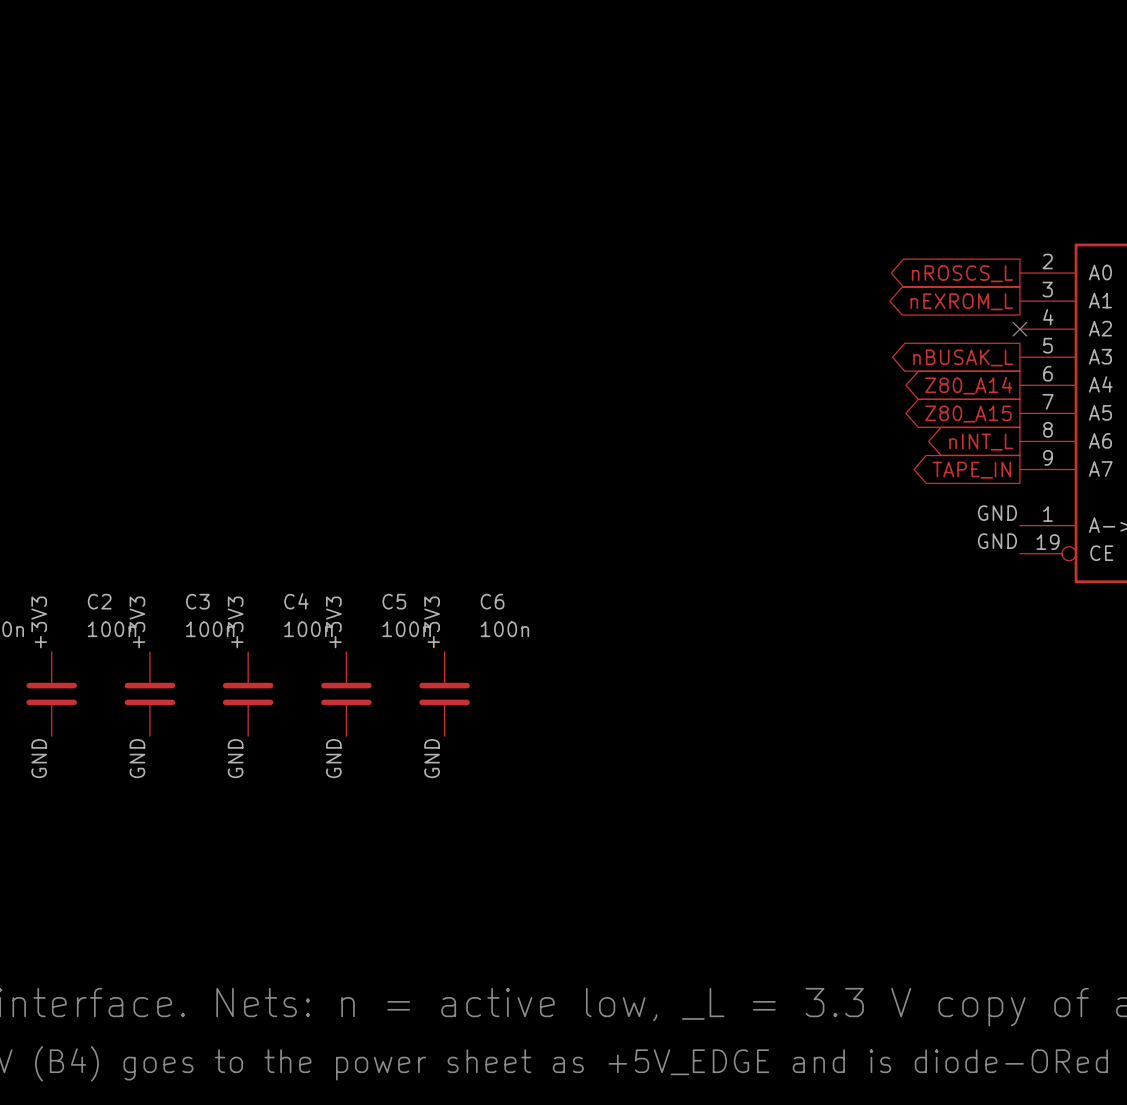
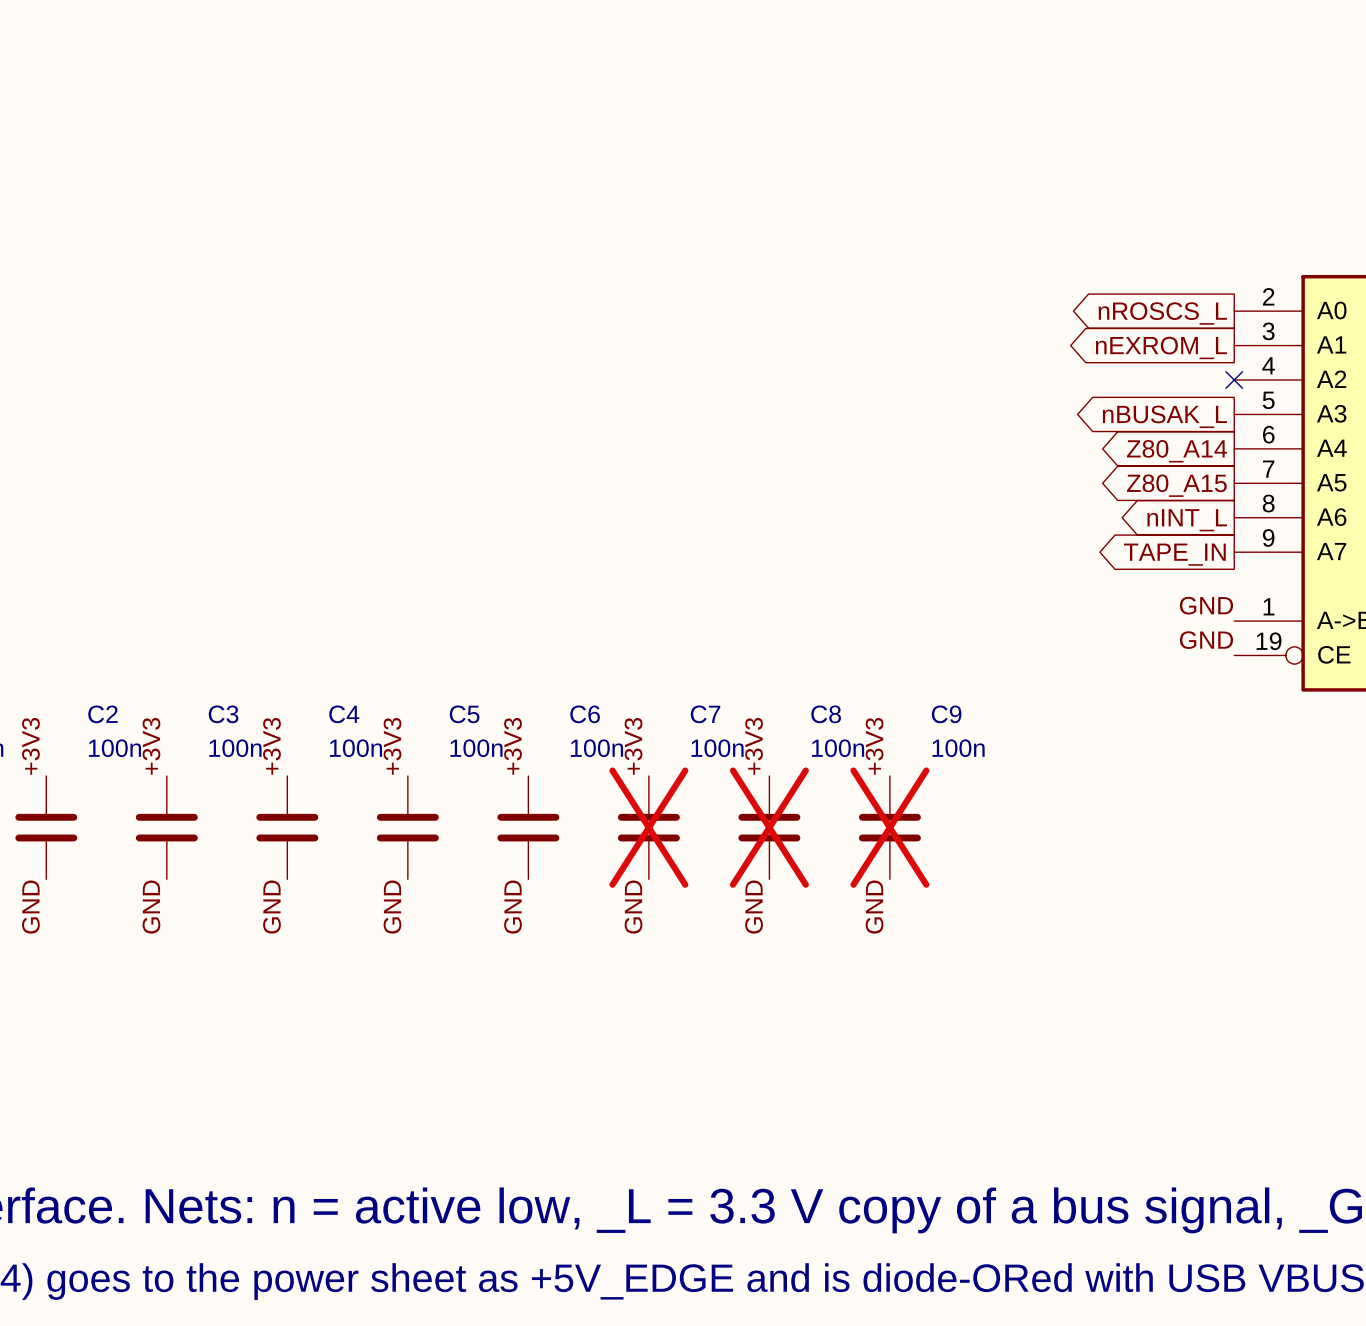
label: none -> +3V3 (633, 746)
label: none -> +3V3 (754, 746)
label: none -> +3V3 (874, 746)
C7: none -> 100n (648, 827)
C8: none -> 100n (769, 827)
C9: none -> 100n (889, 827)
label: none -> GND (633, 907)
label: none -> GND (754, 907)
label: none -> GND (874, 907)

